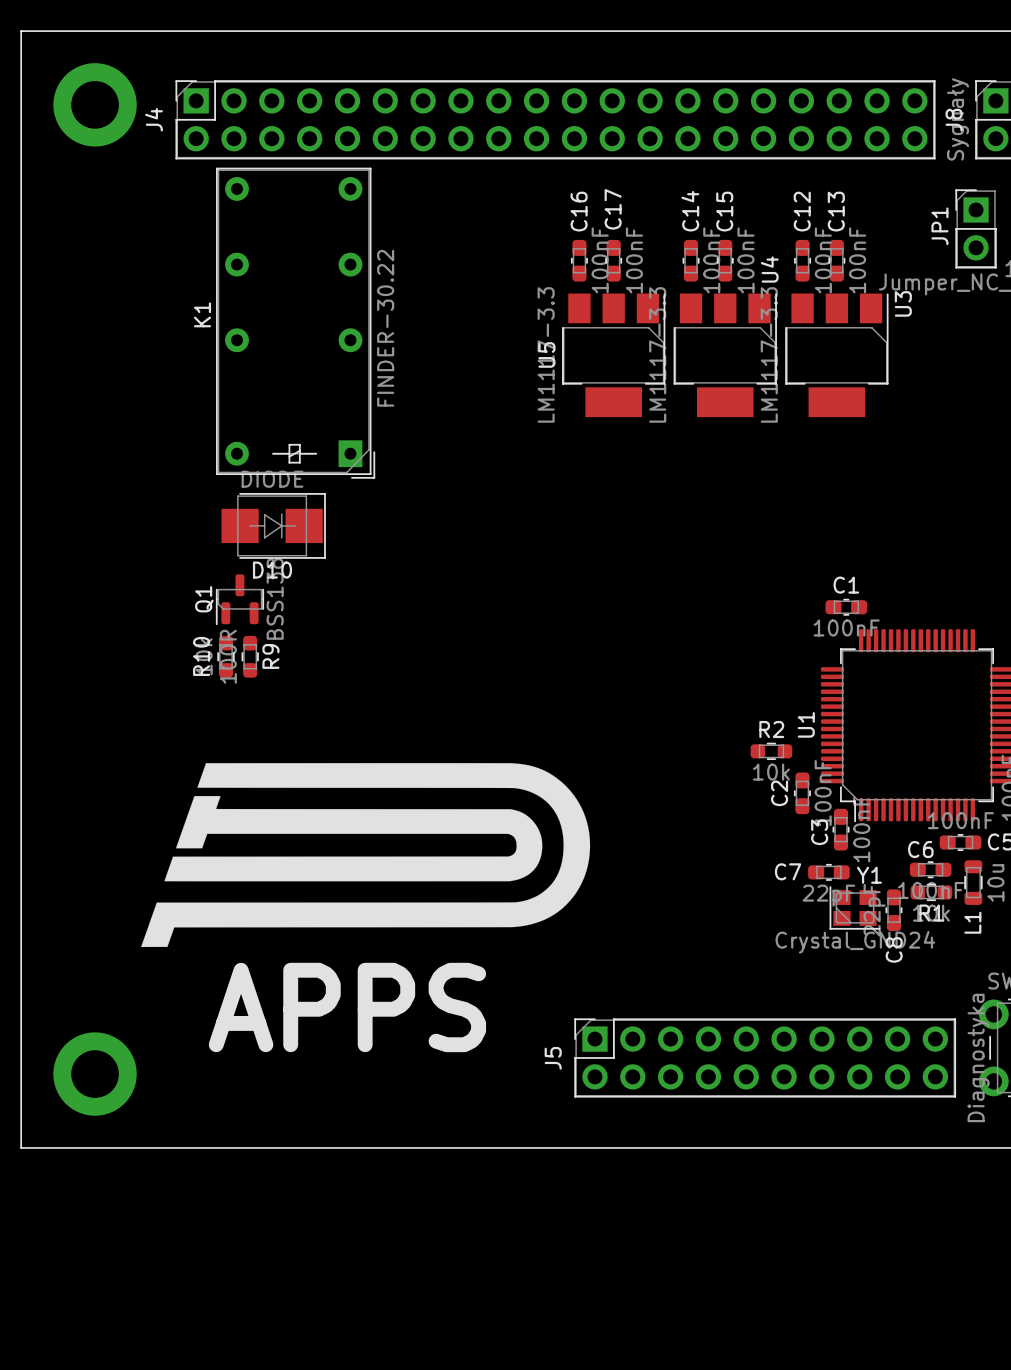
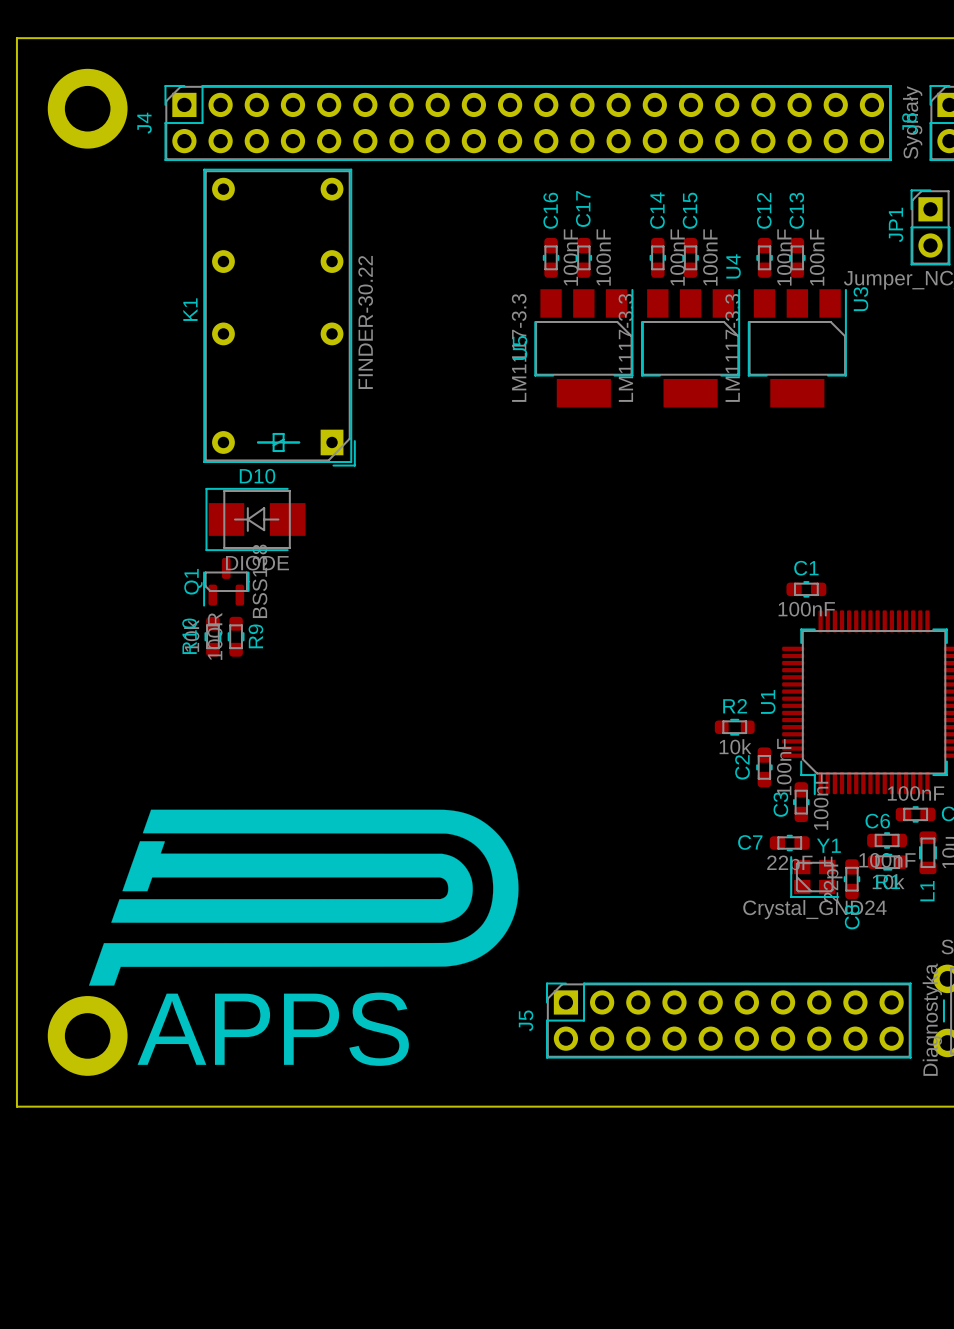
D10 rotation: 0° (273, 525) -> 180° (255, 519)
drawing position: (365, 855) -> (303, 897)
text position: APPS (347, 1007) -> APPS (273, 1029)

